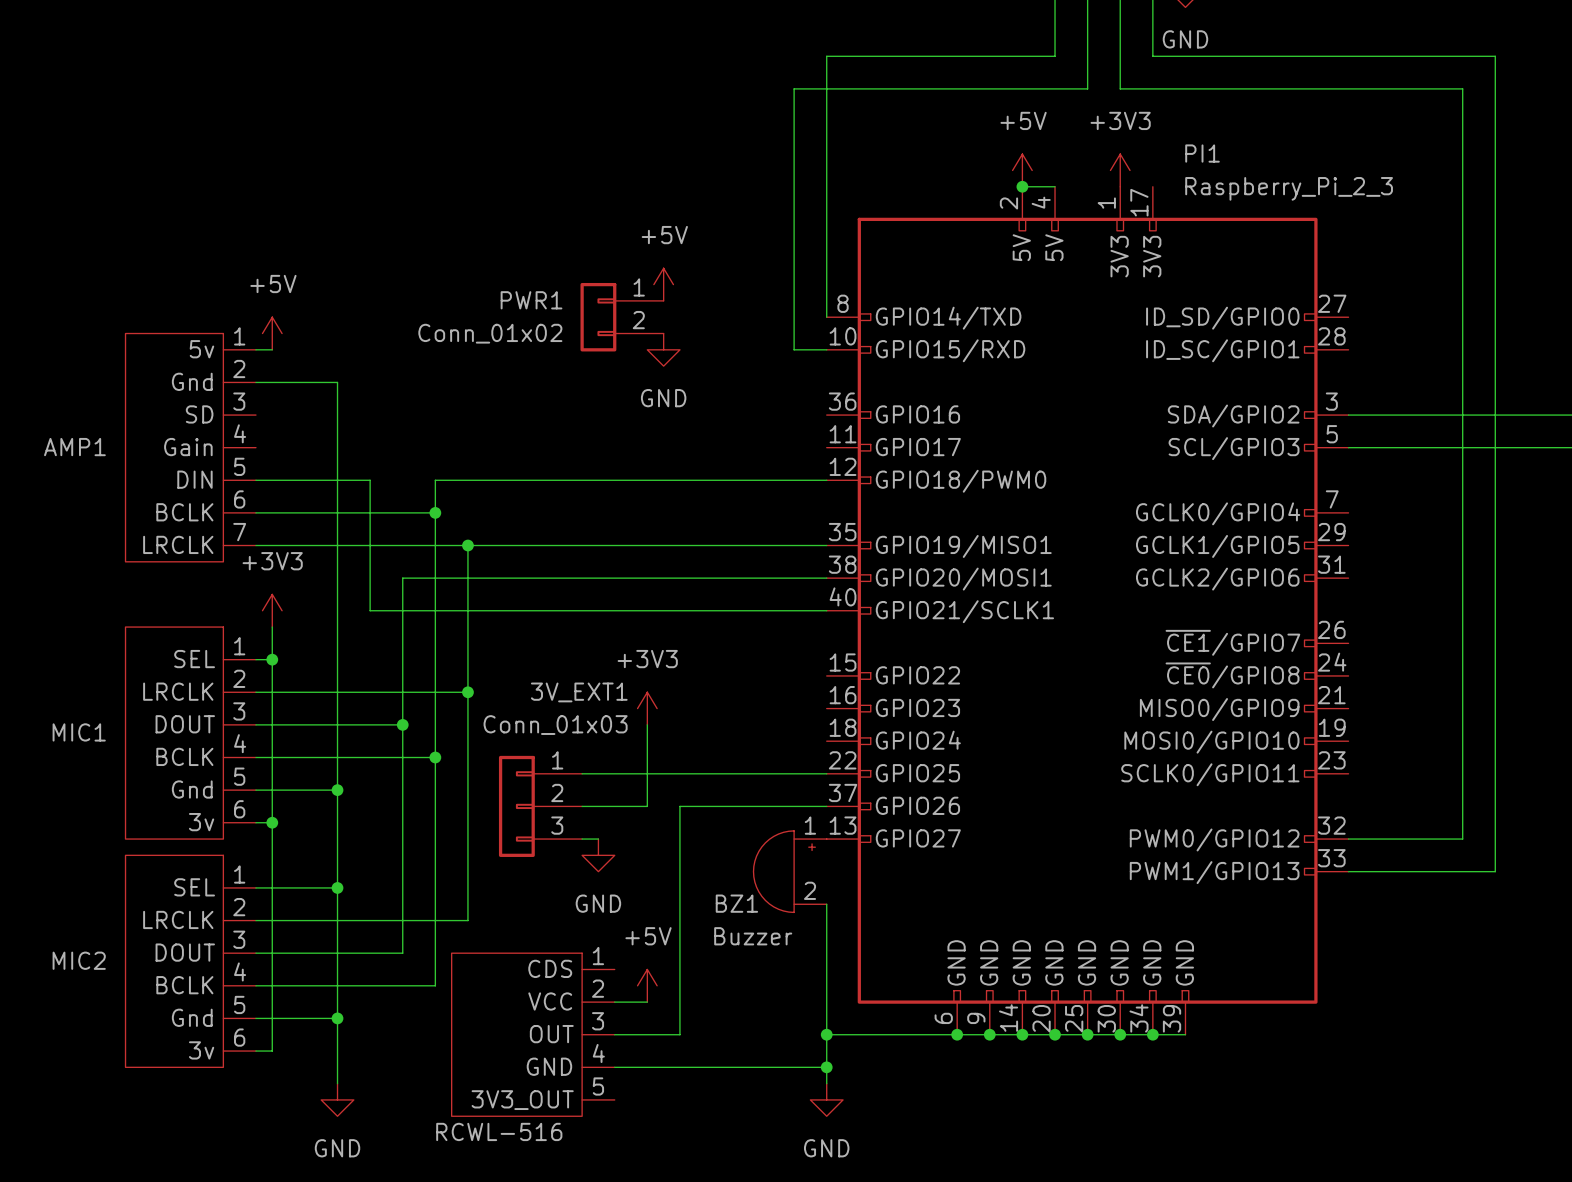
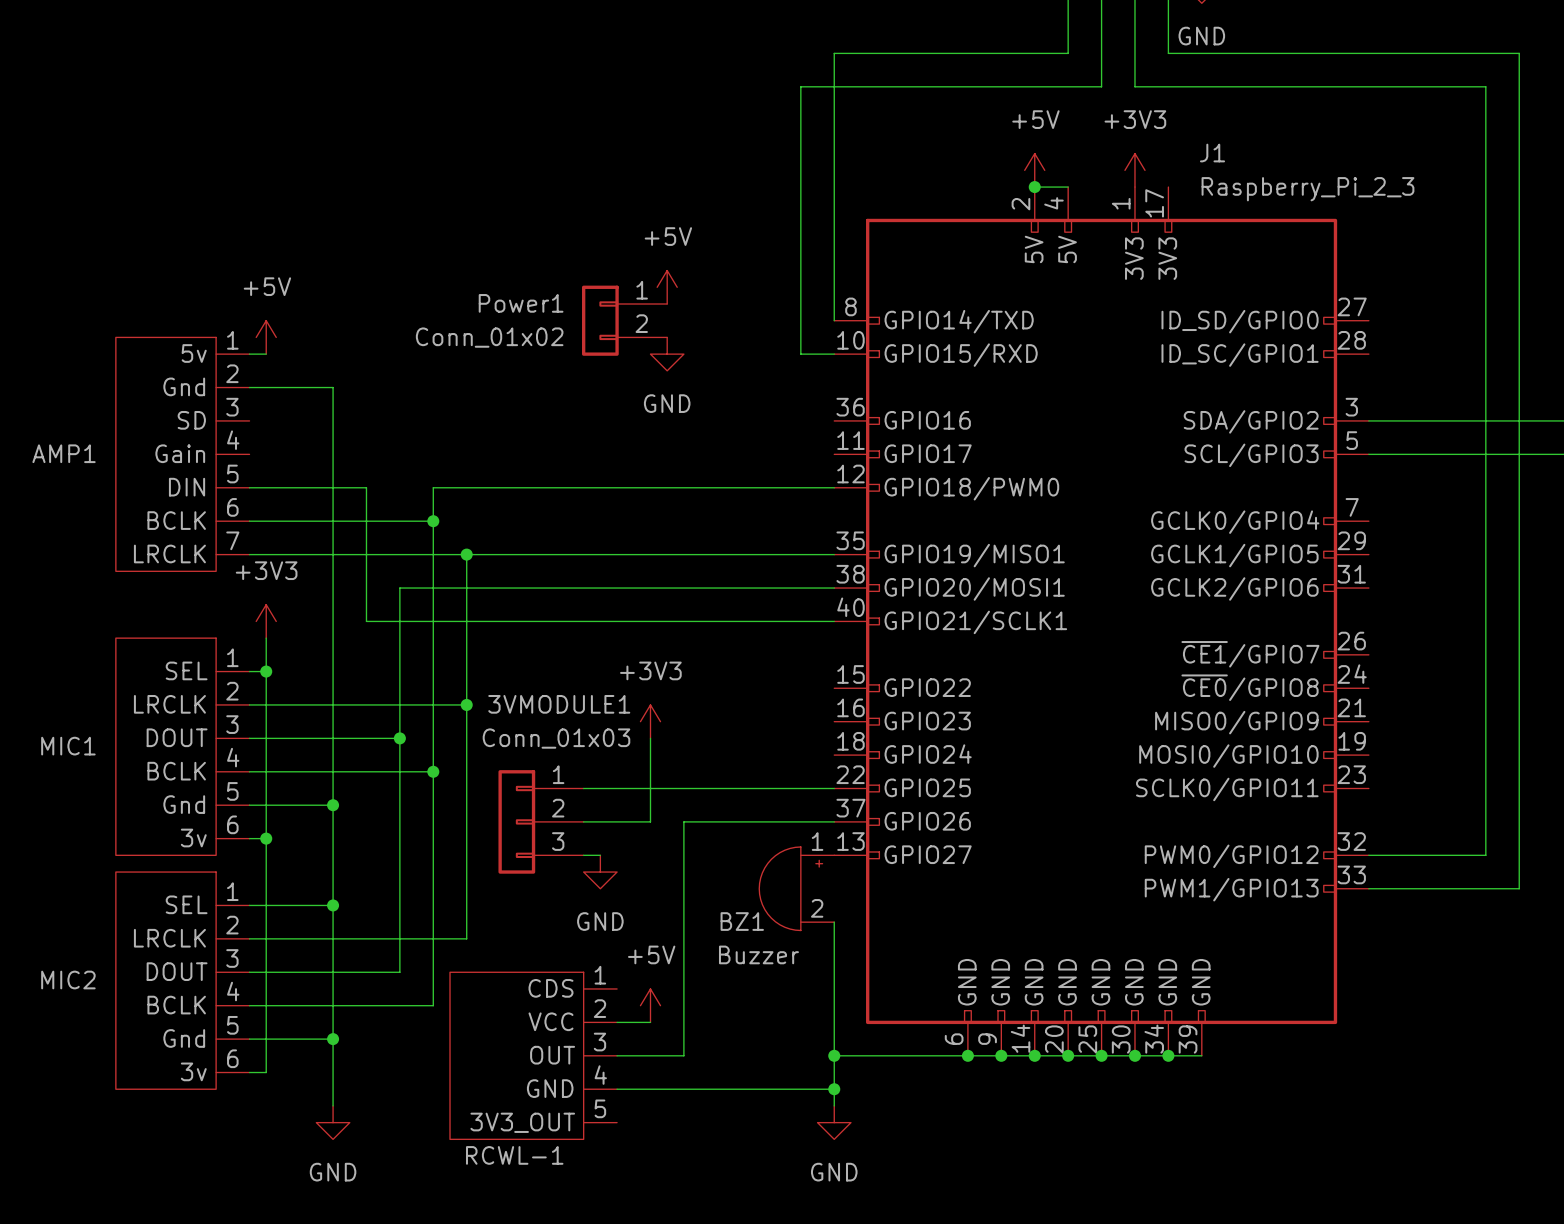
PI1 name: PI1 (1202, 153) -> J1 (1212, 153)
PWR1 name: PWR1 (531, 300) -> Power1 (521, 303)
3V_EXT1 name: 3V_EXT1 (579, 692) -> 3VMODULE1 (559, 704)
RCWL-516 name: RCWL-516 (499, 1131) -> RCWL-1 (514, 1155)

